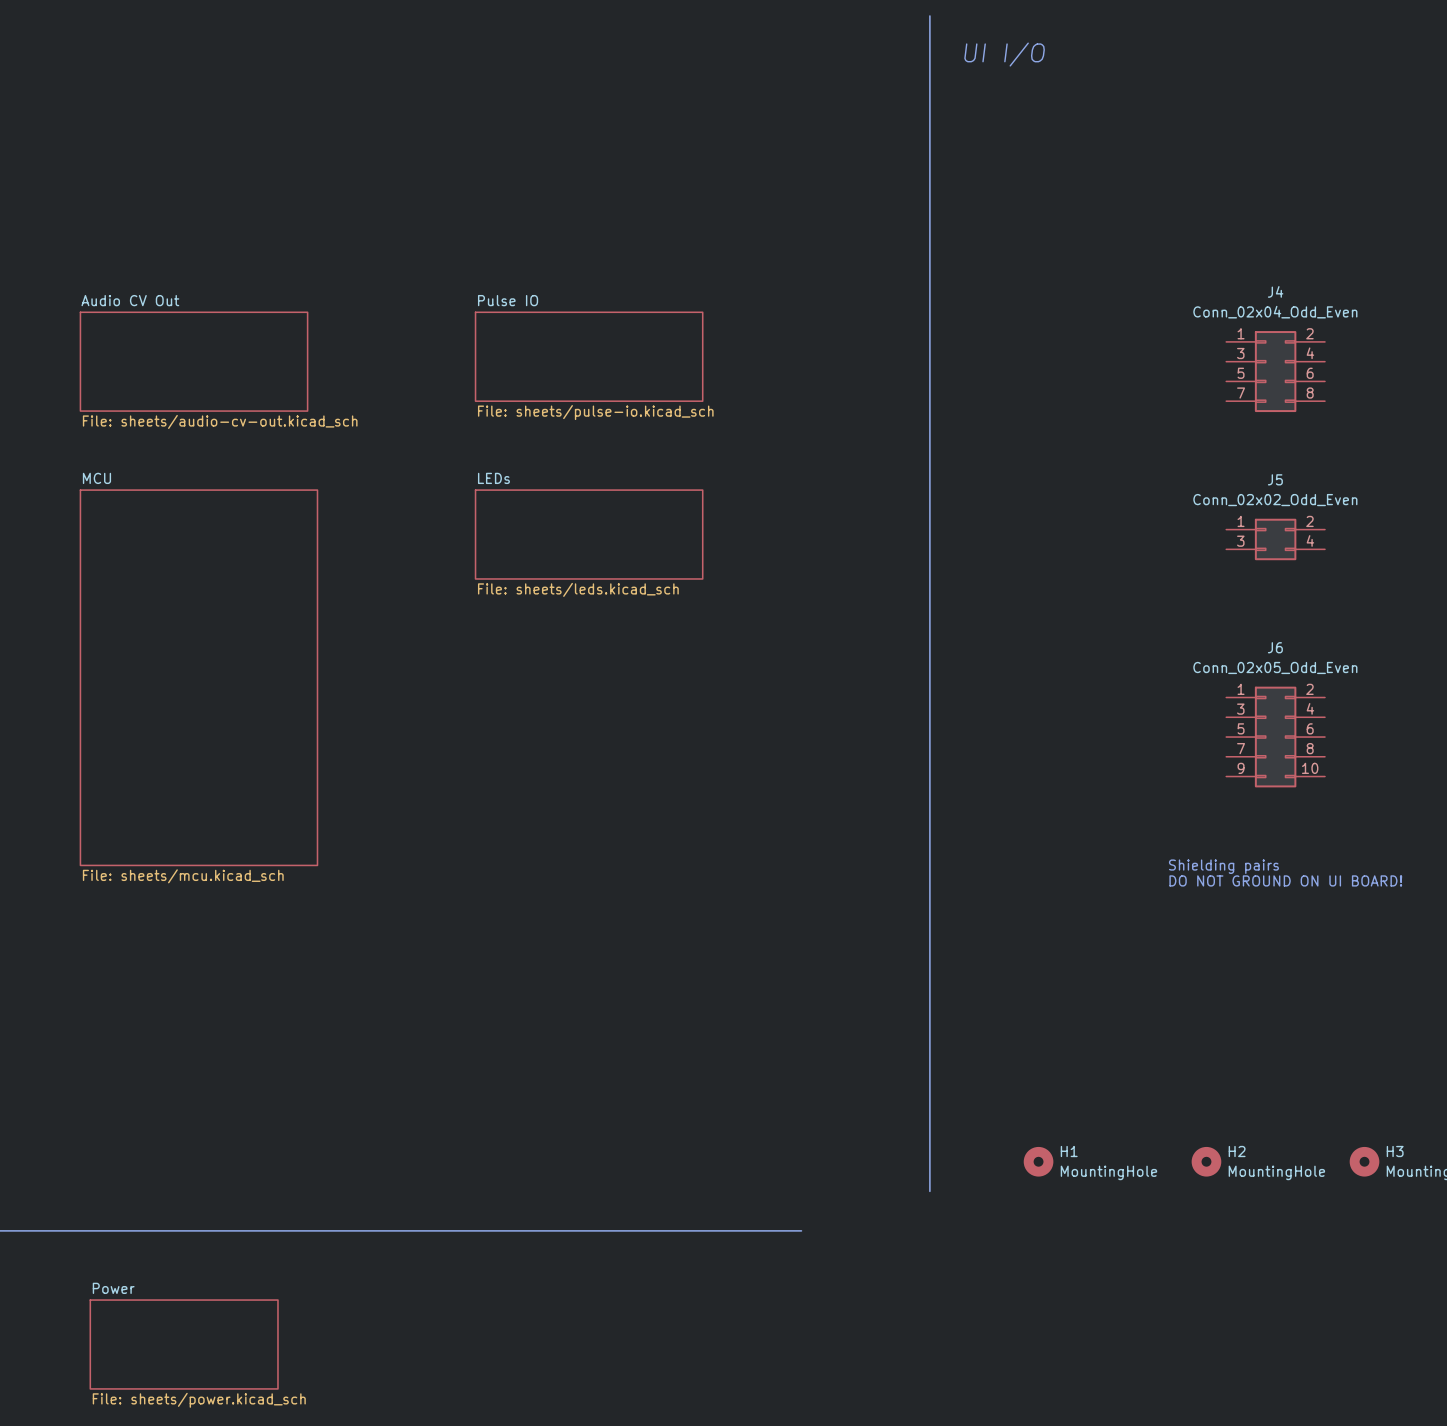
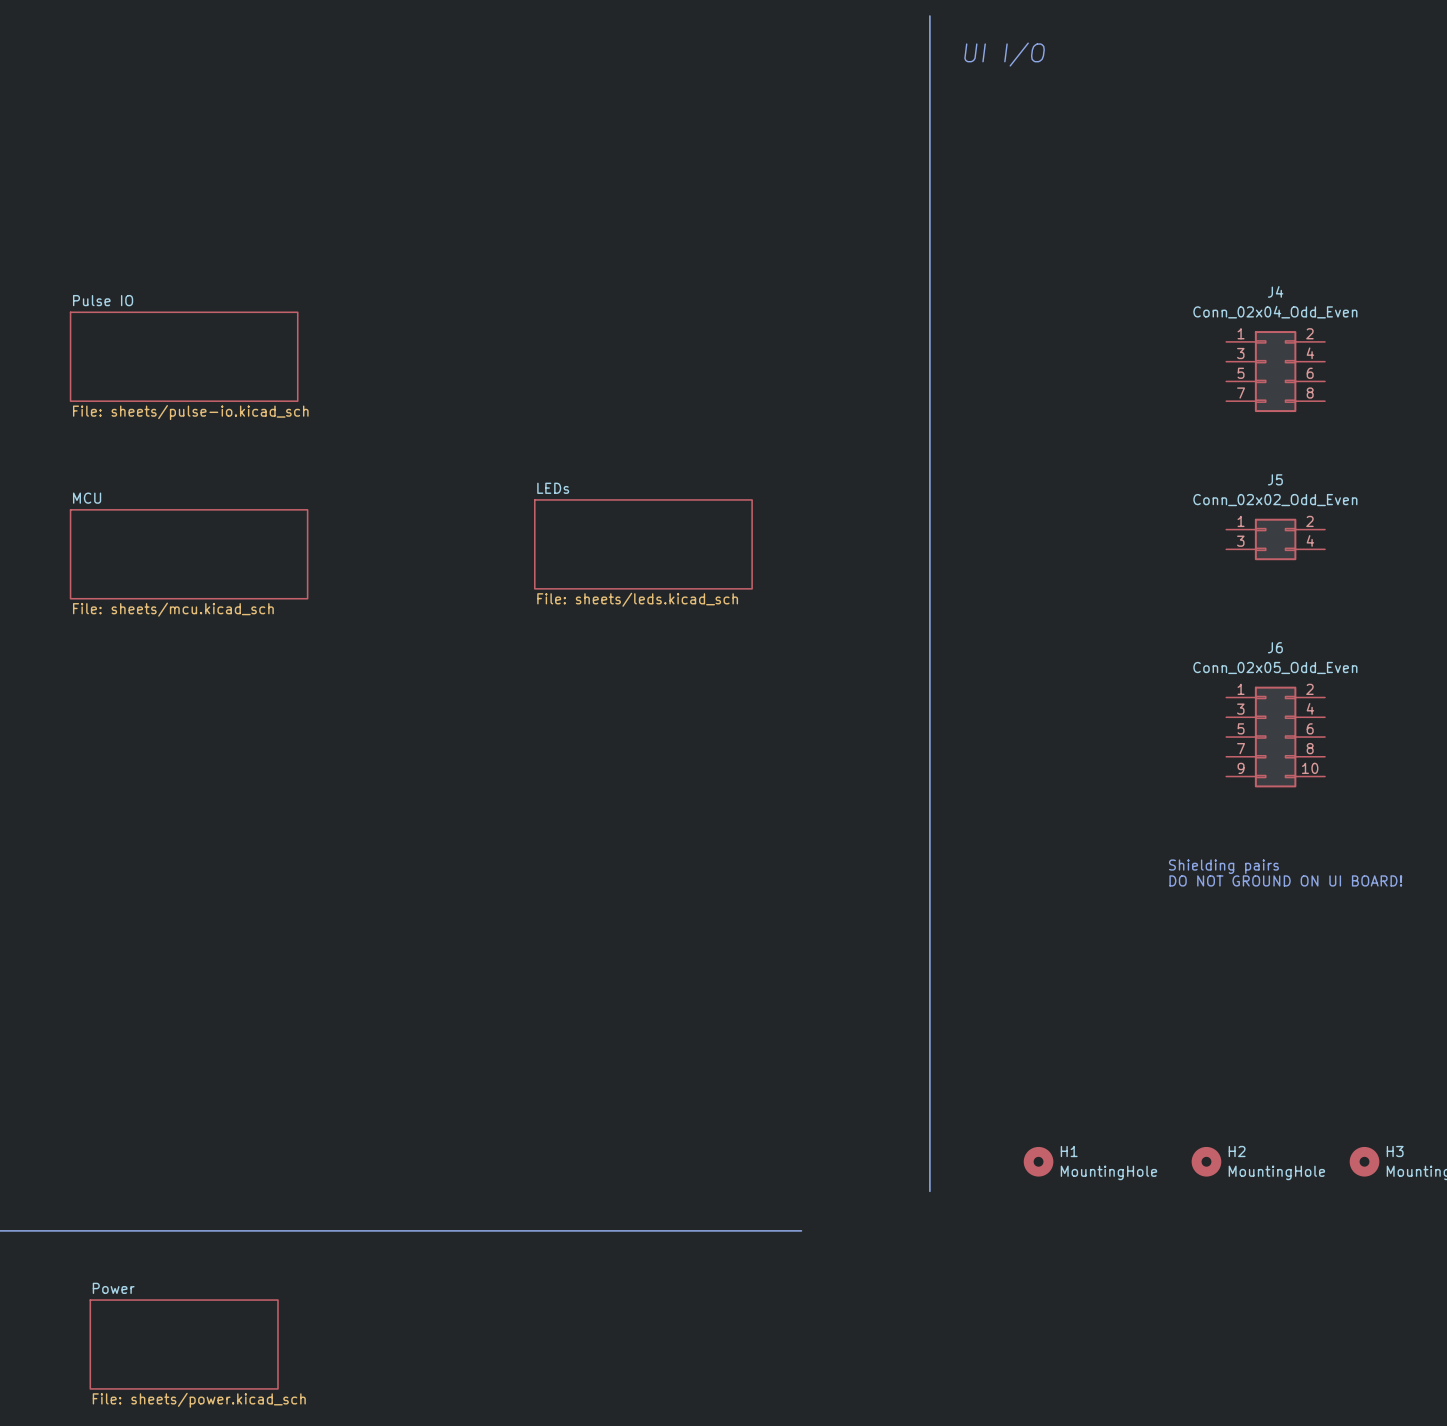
sheet Pulse IO: none -> File: sheets/pulse-io.kicad_sch (184, 356)
sheet Pulse IO: File: sheets/pulse-io.kicad_sch (589, 356) -> none
sheet Audio CV Out: File: sheets/audio-cv-out.kicad_sch (194, 361) -> none
sheet LEDs: File: sheets/leds.kicad_sch (589, 534) -> none
sheet LEDs: none -> File: sheets/leds.kicad_sch (643, 544)
sheet MCU: none -> File: sheets/mcu.kicad_sch (189, 554)
sheet MCU: File: sheets/mcu.kicad_sch (198, 677) -> none

